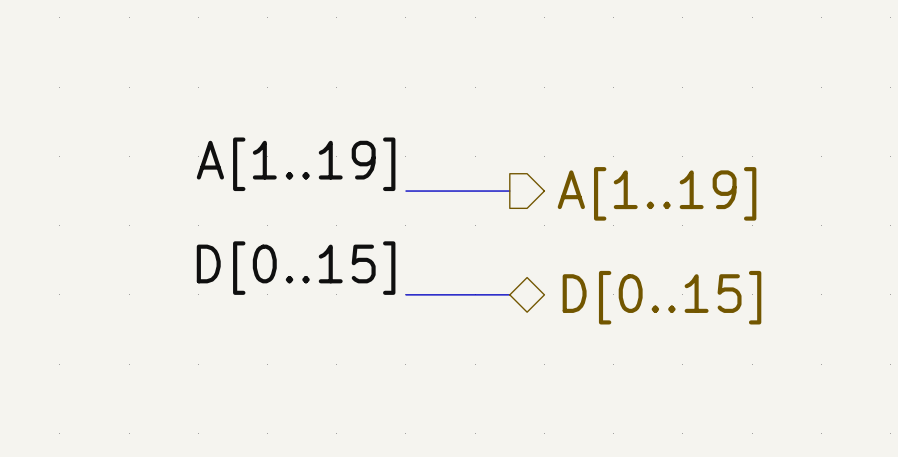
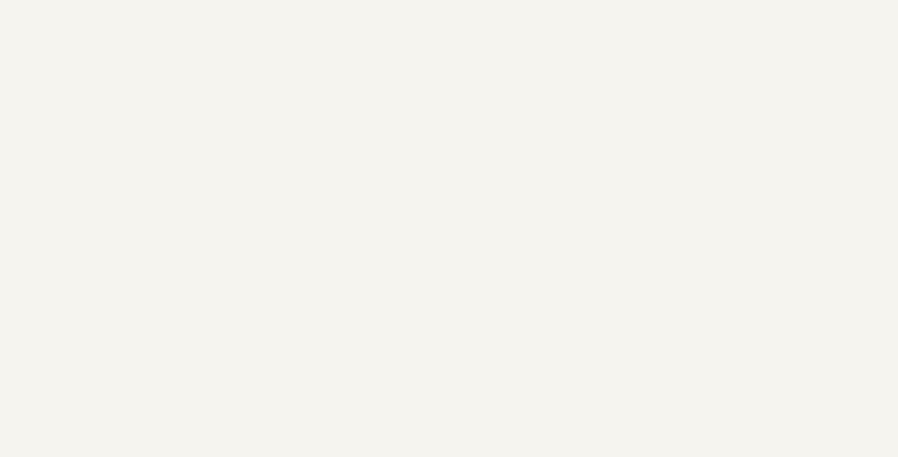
label: A[1..19] (296, 164) -> none
bus: (405, 191) (509, 191) -> none
hierarchical label: A[1..19] (657, 193) -> none
label: D[0..15] (296, 268) -> none
bus: (405, 294) (509, 294) -> none
hierarchical label: D[0..15] (661, 297) -> none

